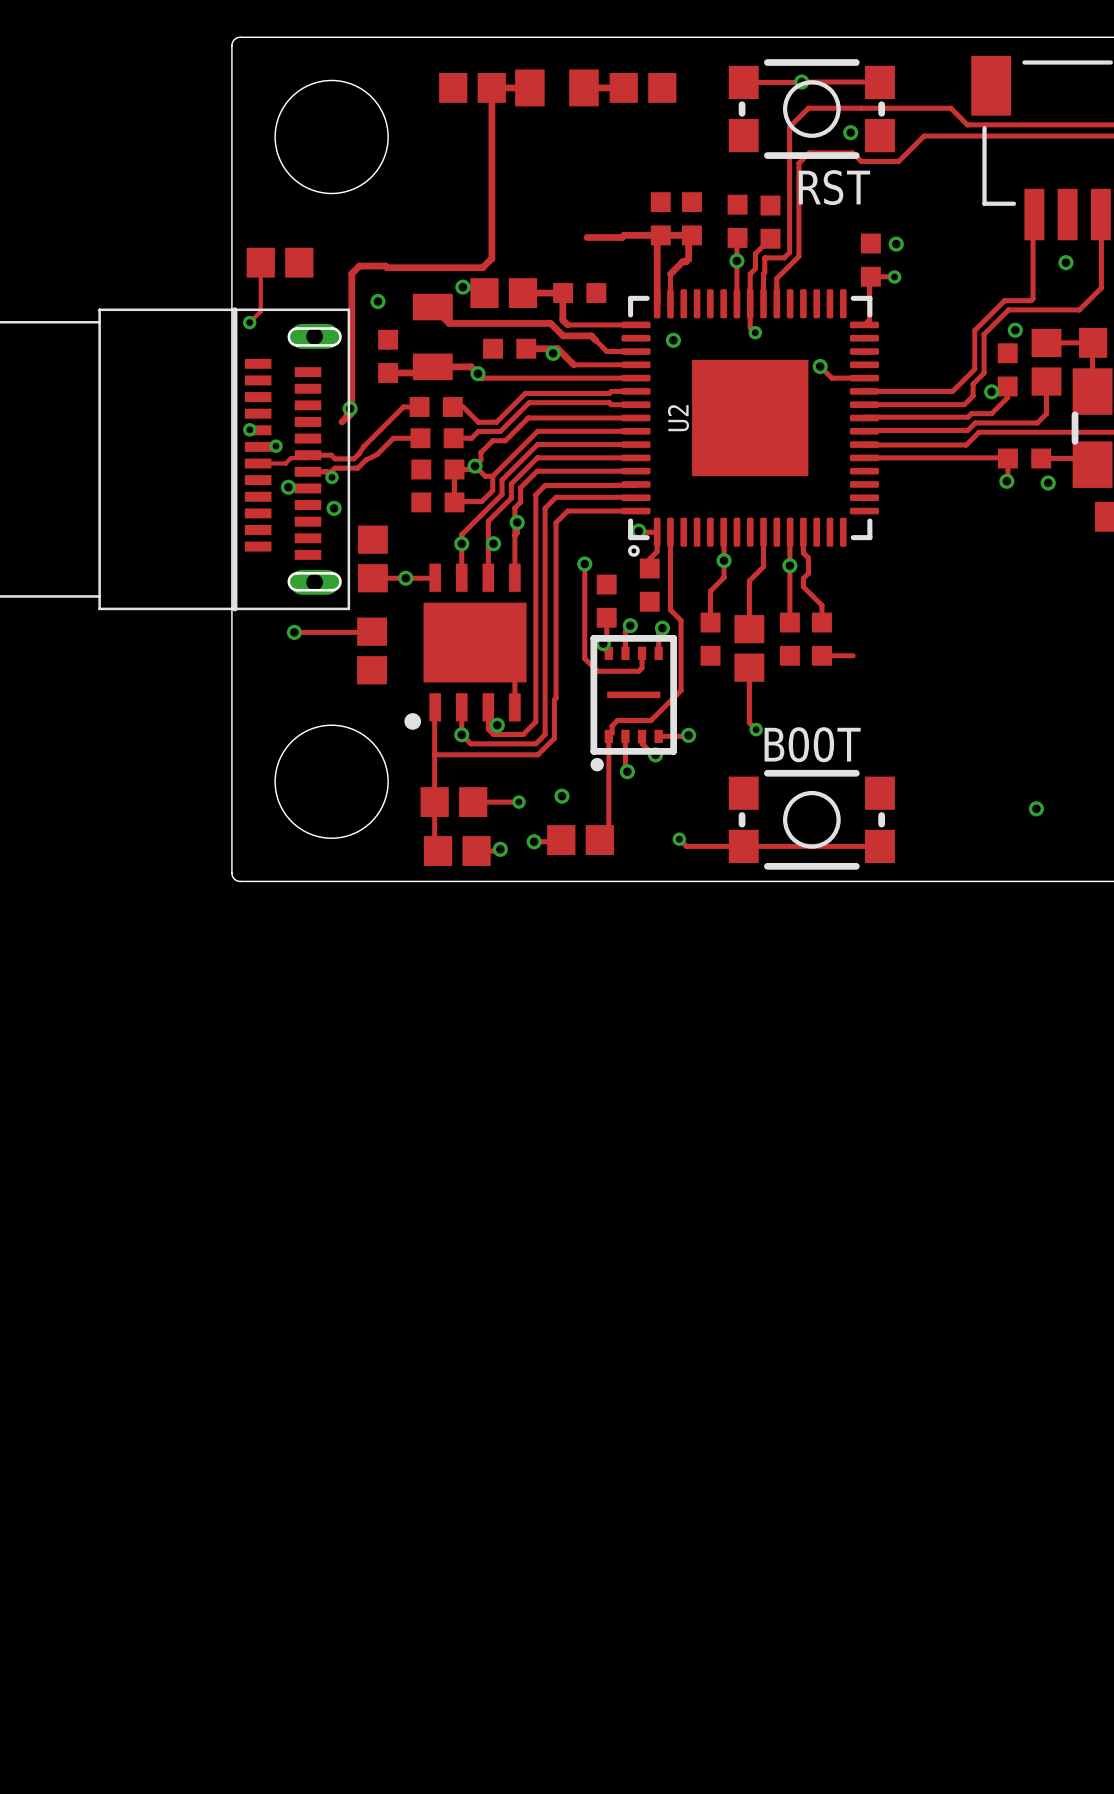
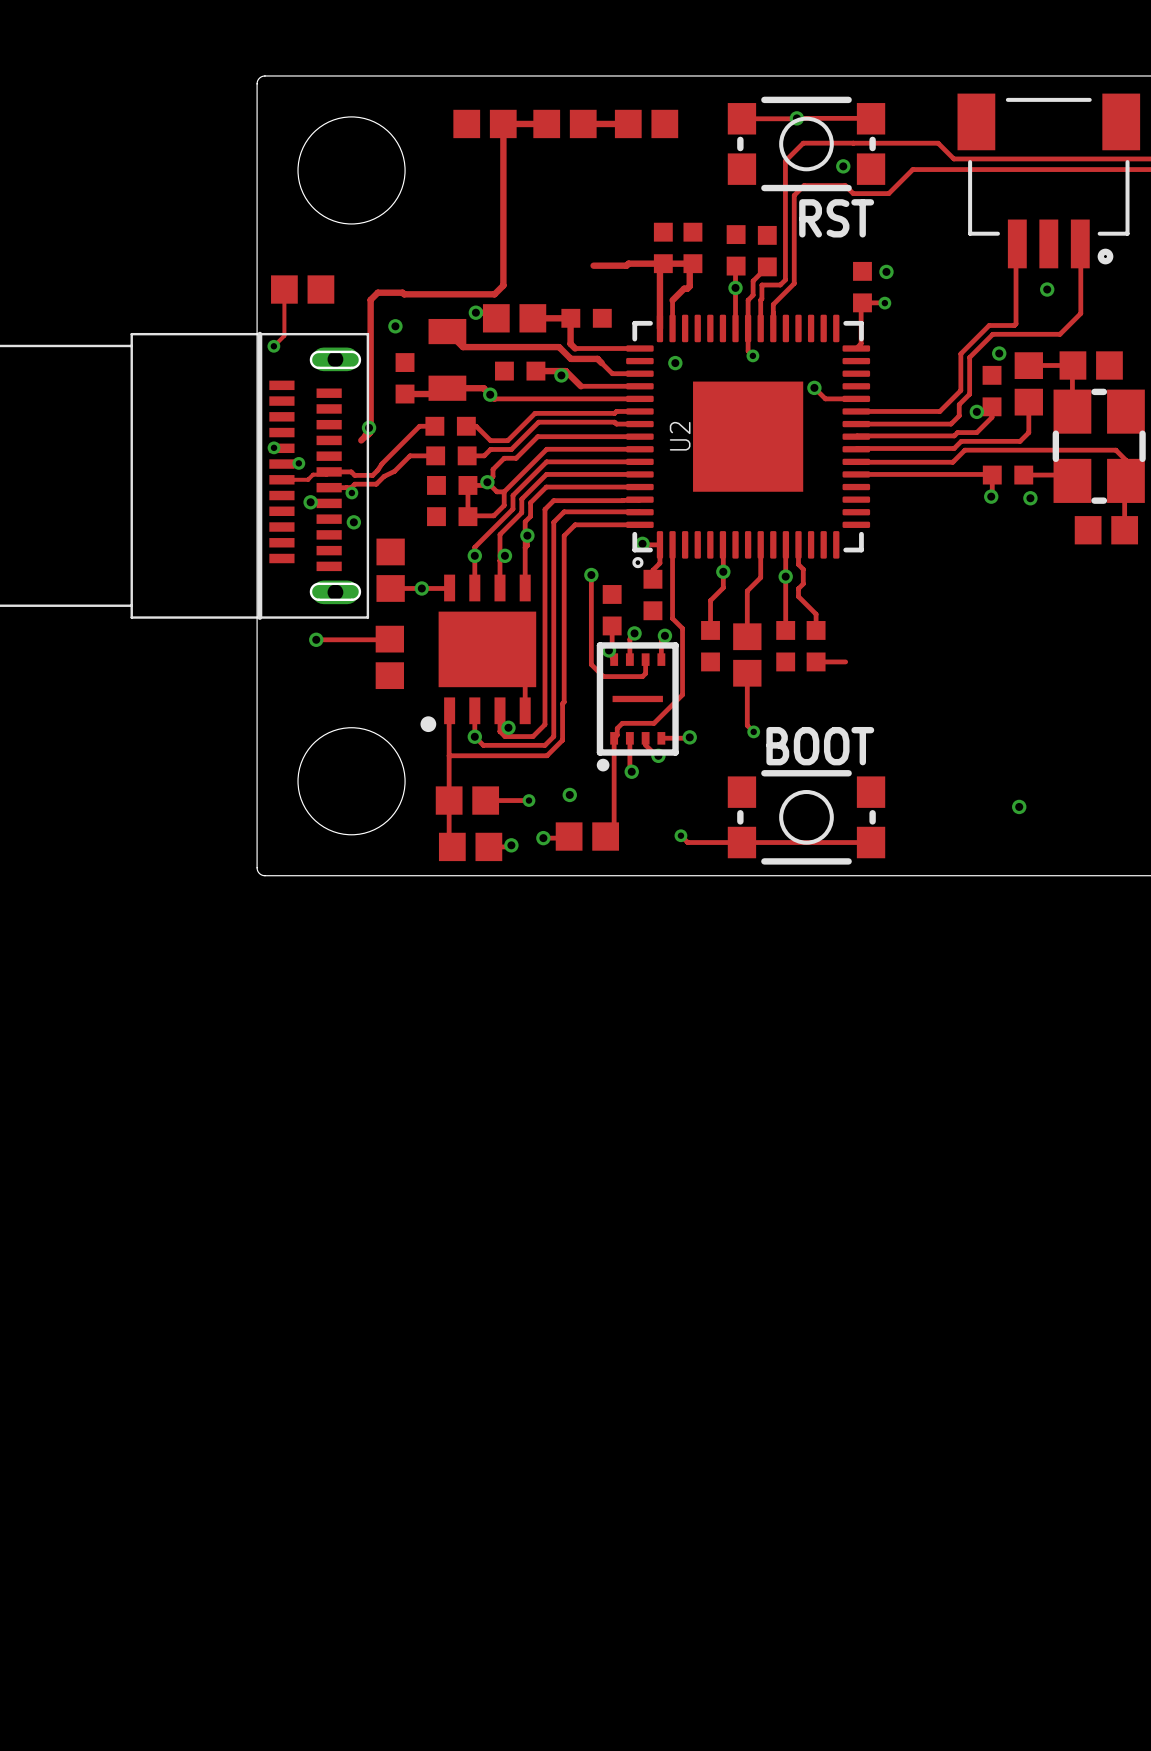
part footprint: [515, 69, 599, 107] -> [533, 109, 597, 139]

